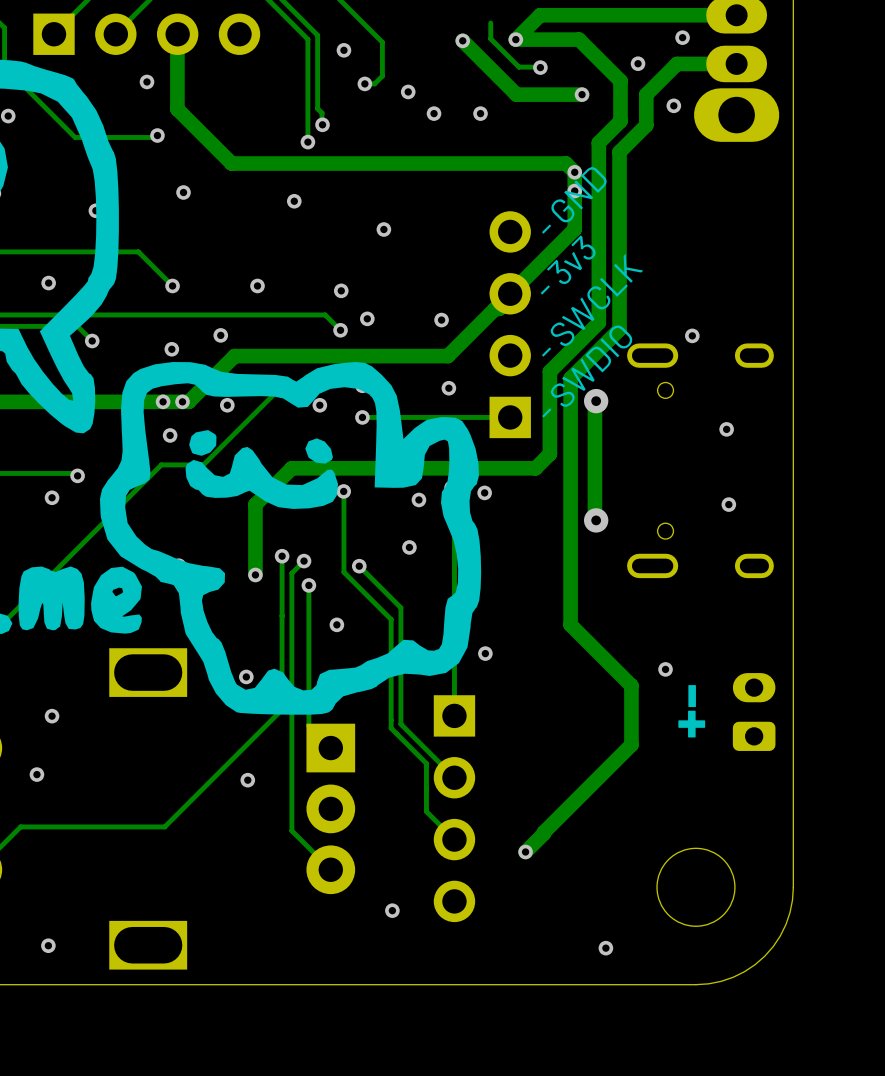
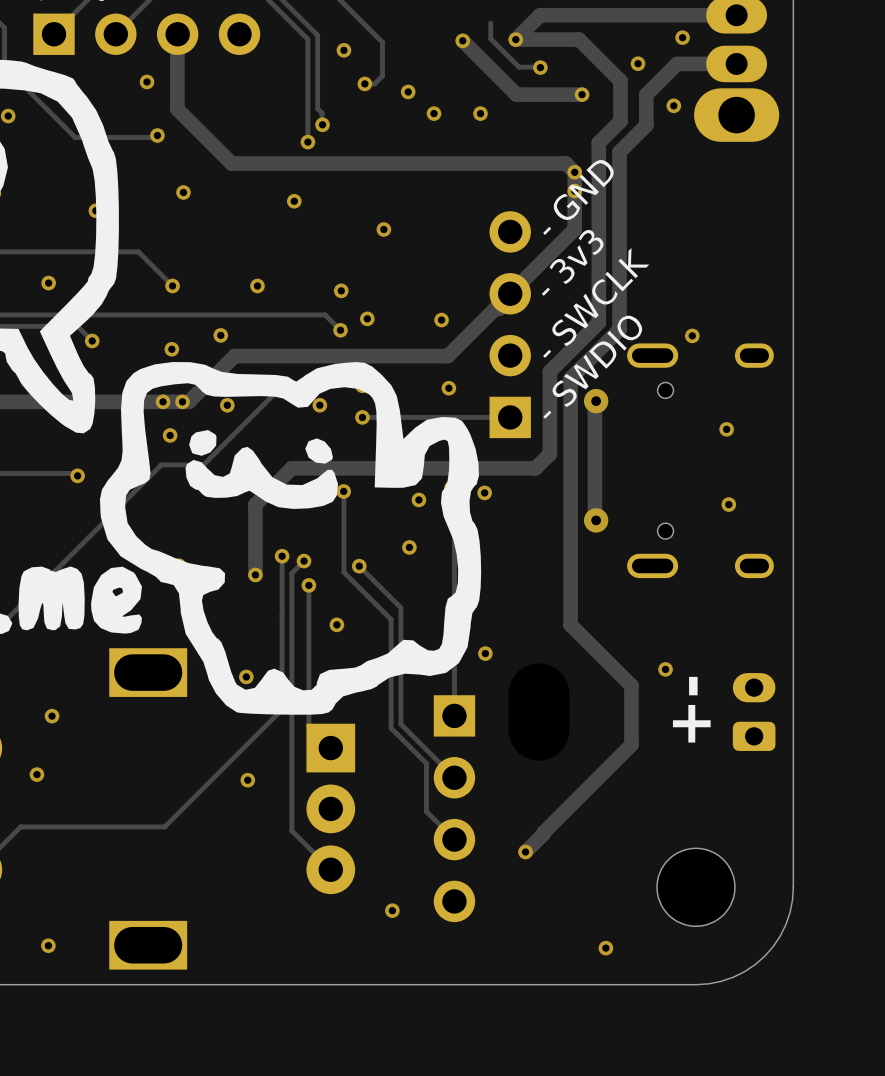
via: (52, 497) -> none

